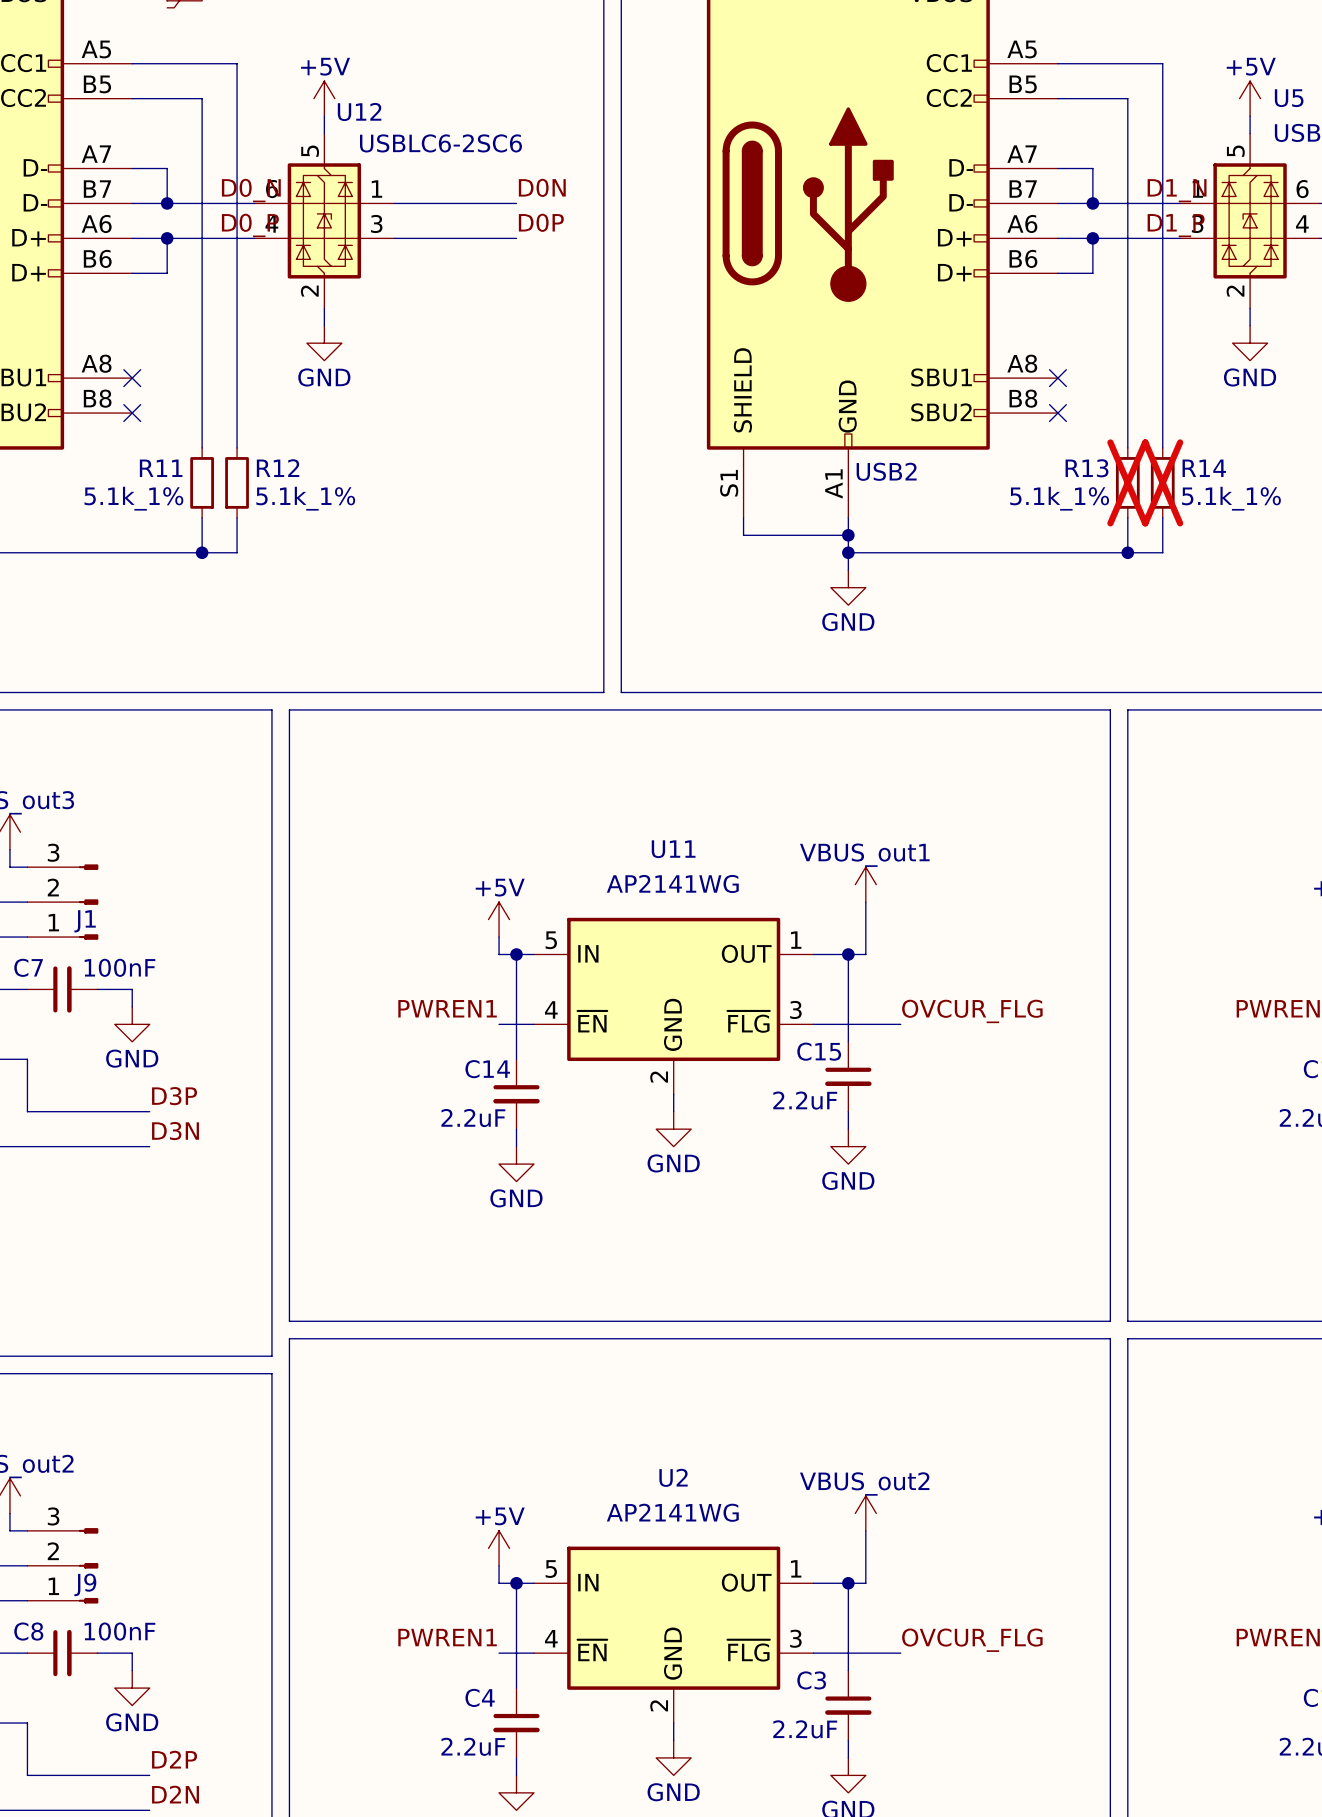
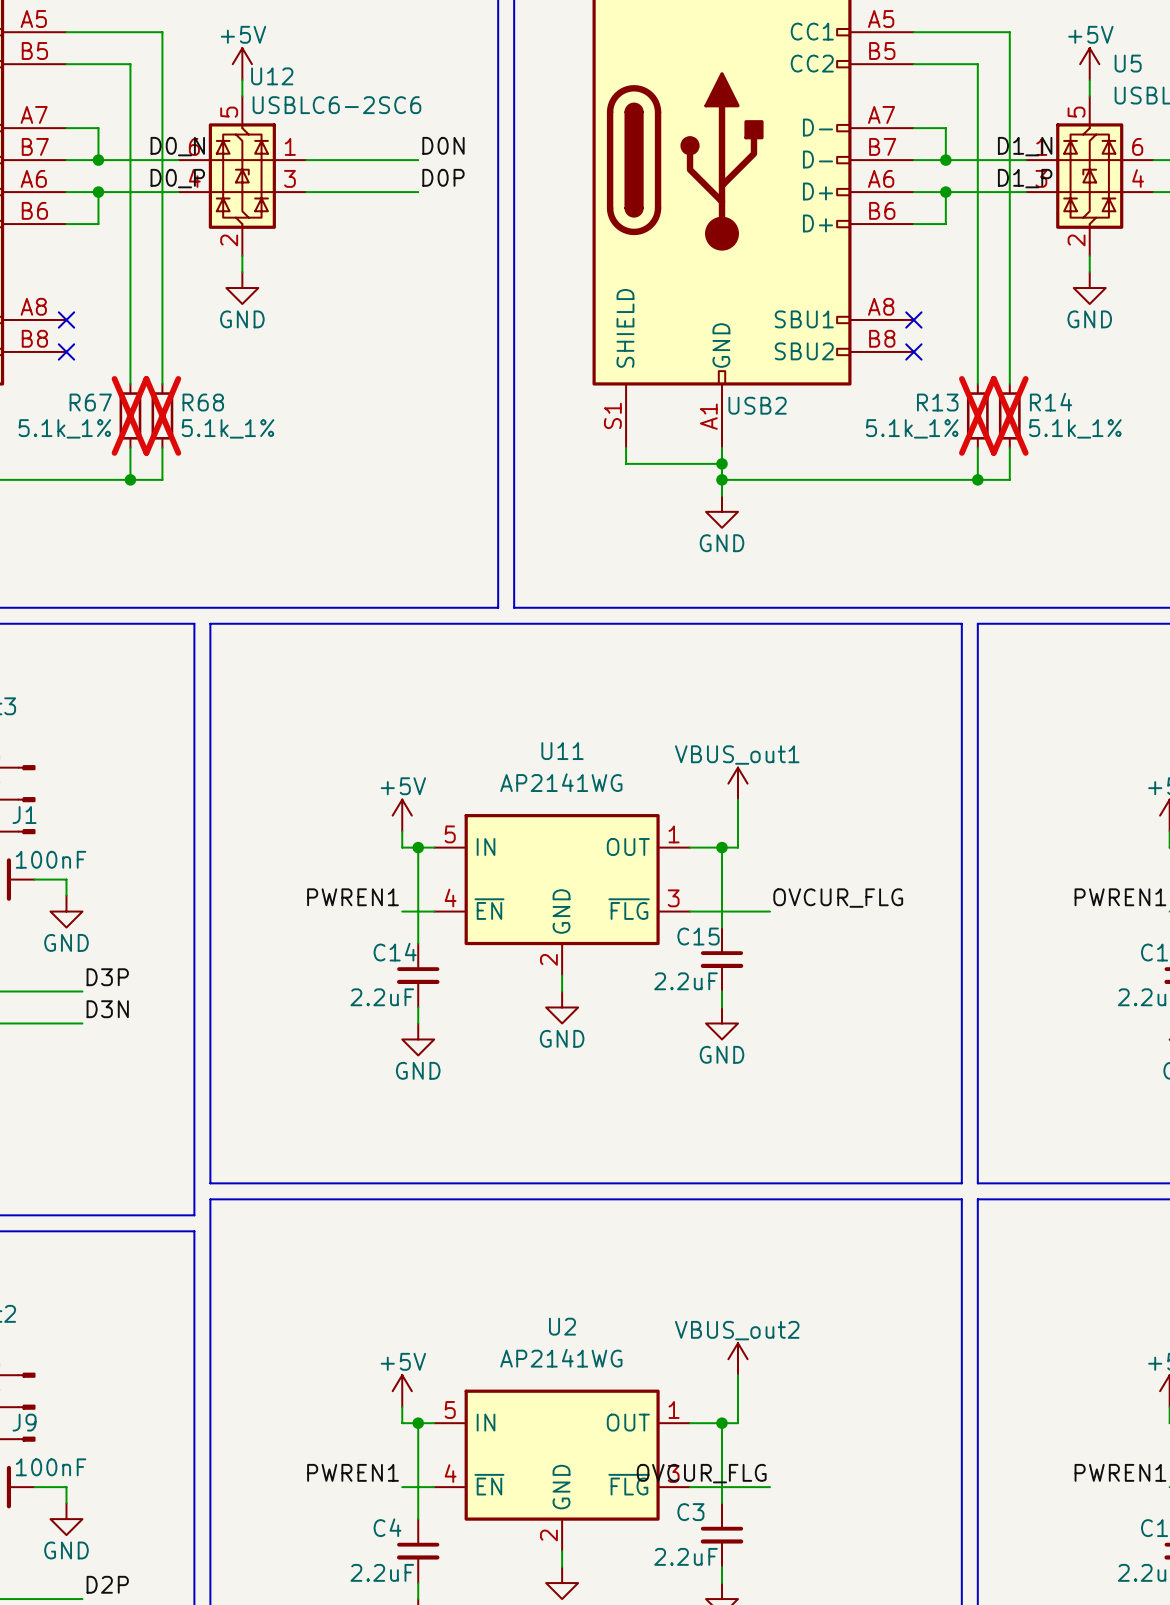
R11 name: R11 (161, 468) -> R67 (90, 402)
R12 name: R12 (278, 468) -> R68 (203, 402)
R11 do-not-place cross: none -> (130, 415)
R12 do-not-place cross: none -> (162, 415)
label position: OVCUR_FLG (972, 1640) -> OVCUR_FLG (701, 1473)

